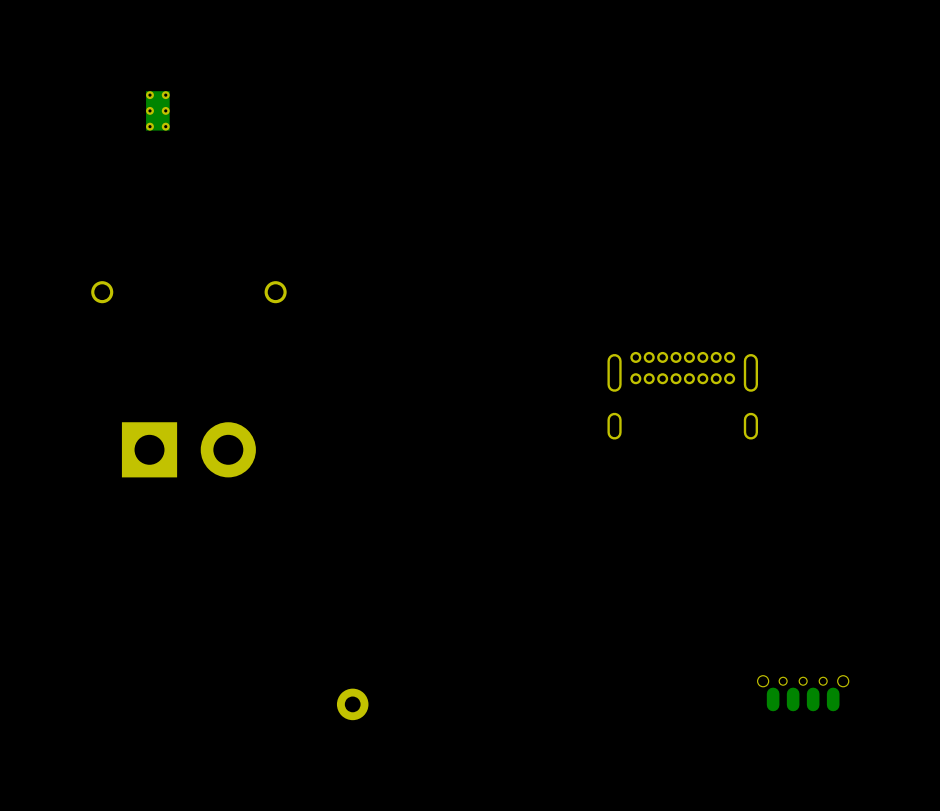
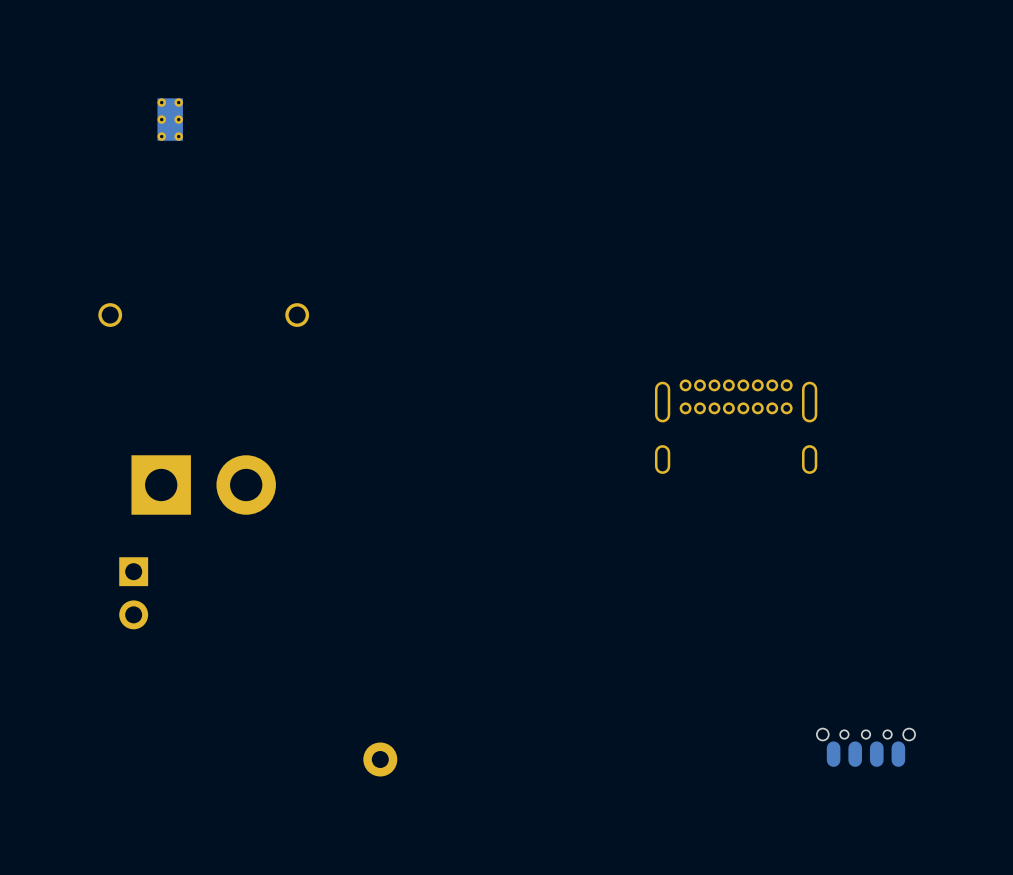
part: none -> (133, 593)

